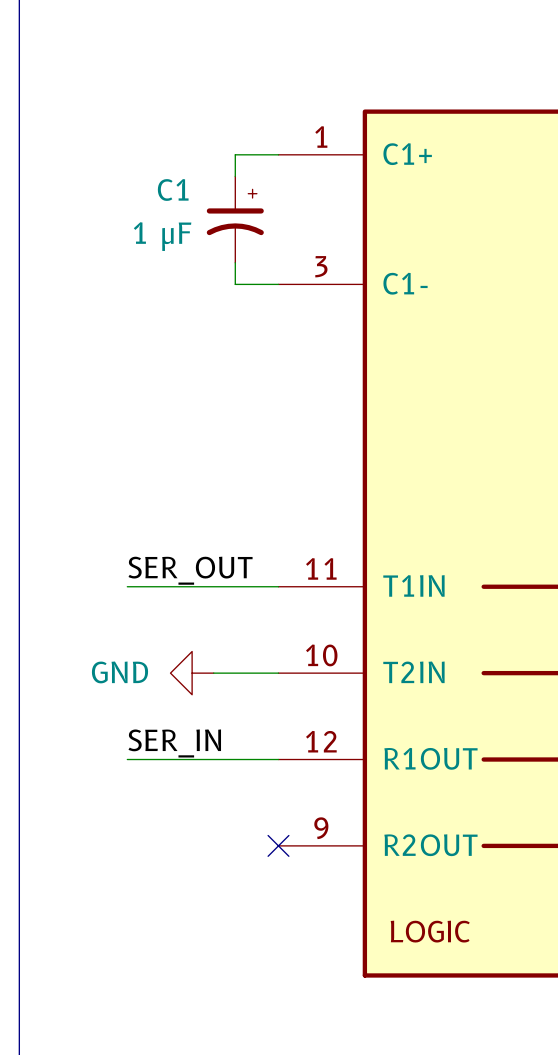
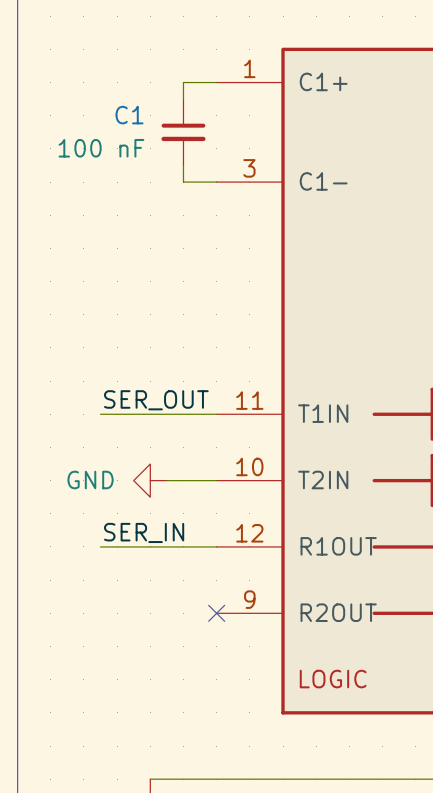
C1 symbol: [206, 176, 264, 263] -> [161, 99, 206, 166]
C1 value: 1 μF (162, 236) -> 100 nF (101, 148)

